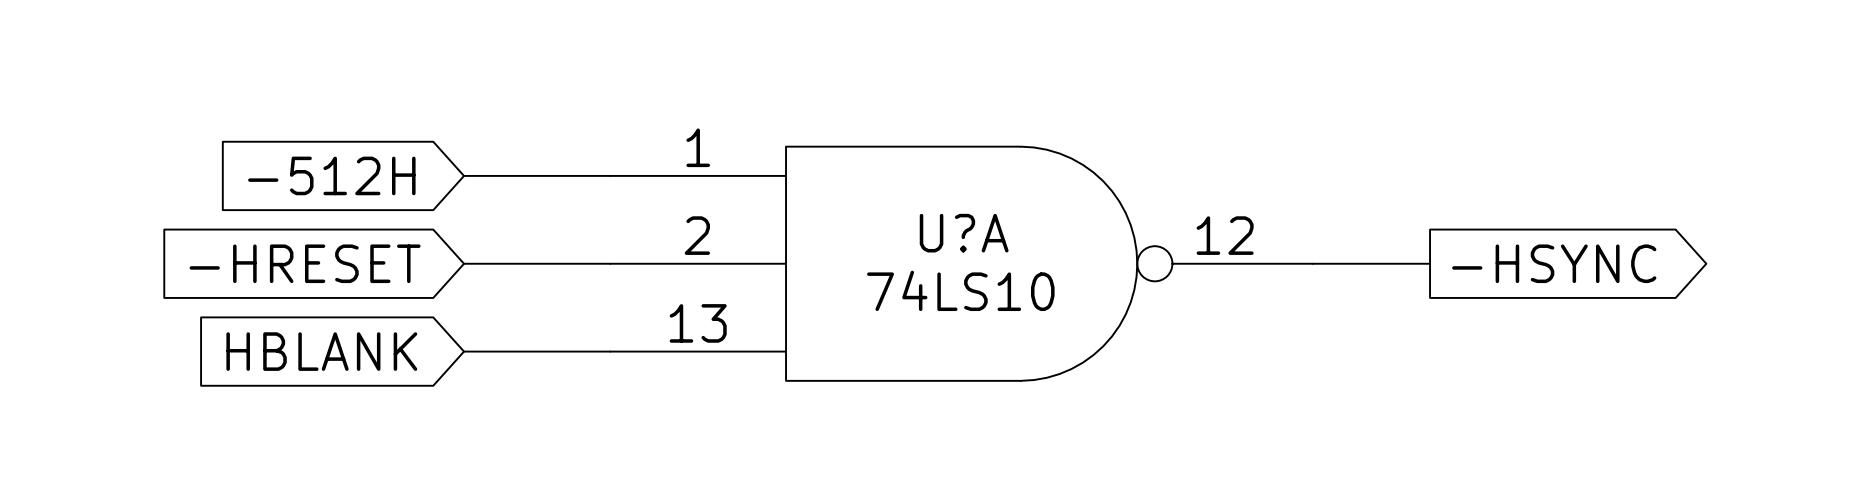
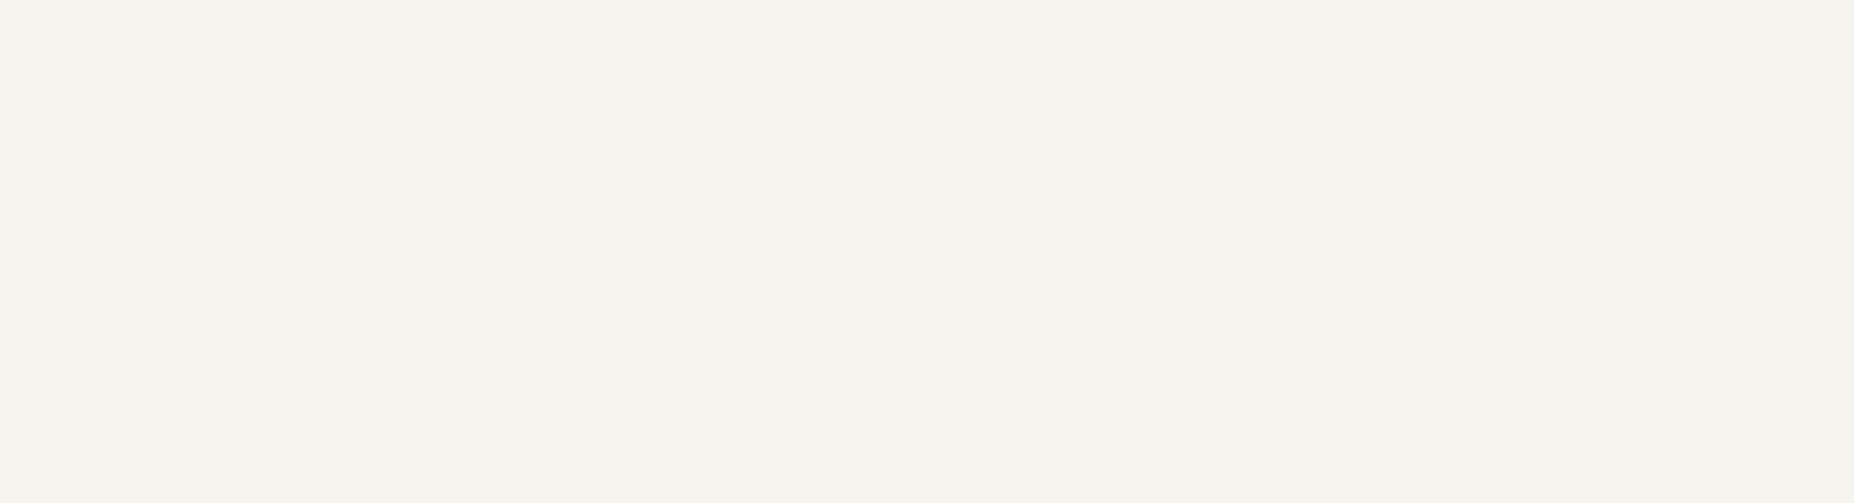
global label: -512H (331, 175) -> none
wire: (464, 175) (610, 175) -> none
global label: -HRESET (305, 263) -> none
wire: (464, 263) (610, 263) -> none
U?A: 74LS10 (961, 263) -> none
wire: (1312, 263) (1430, 263) -> none
global label: -HSYNC (1554, 263) -> none
global label: HBLANK (321, 351) -> none
wire: (464, 351) (610, 351) -> none

